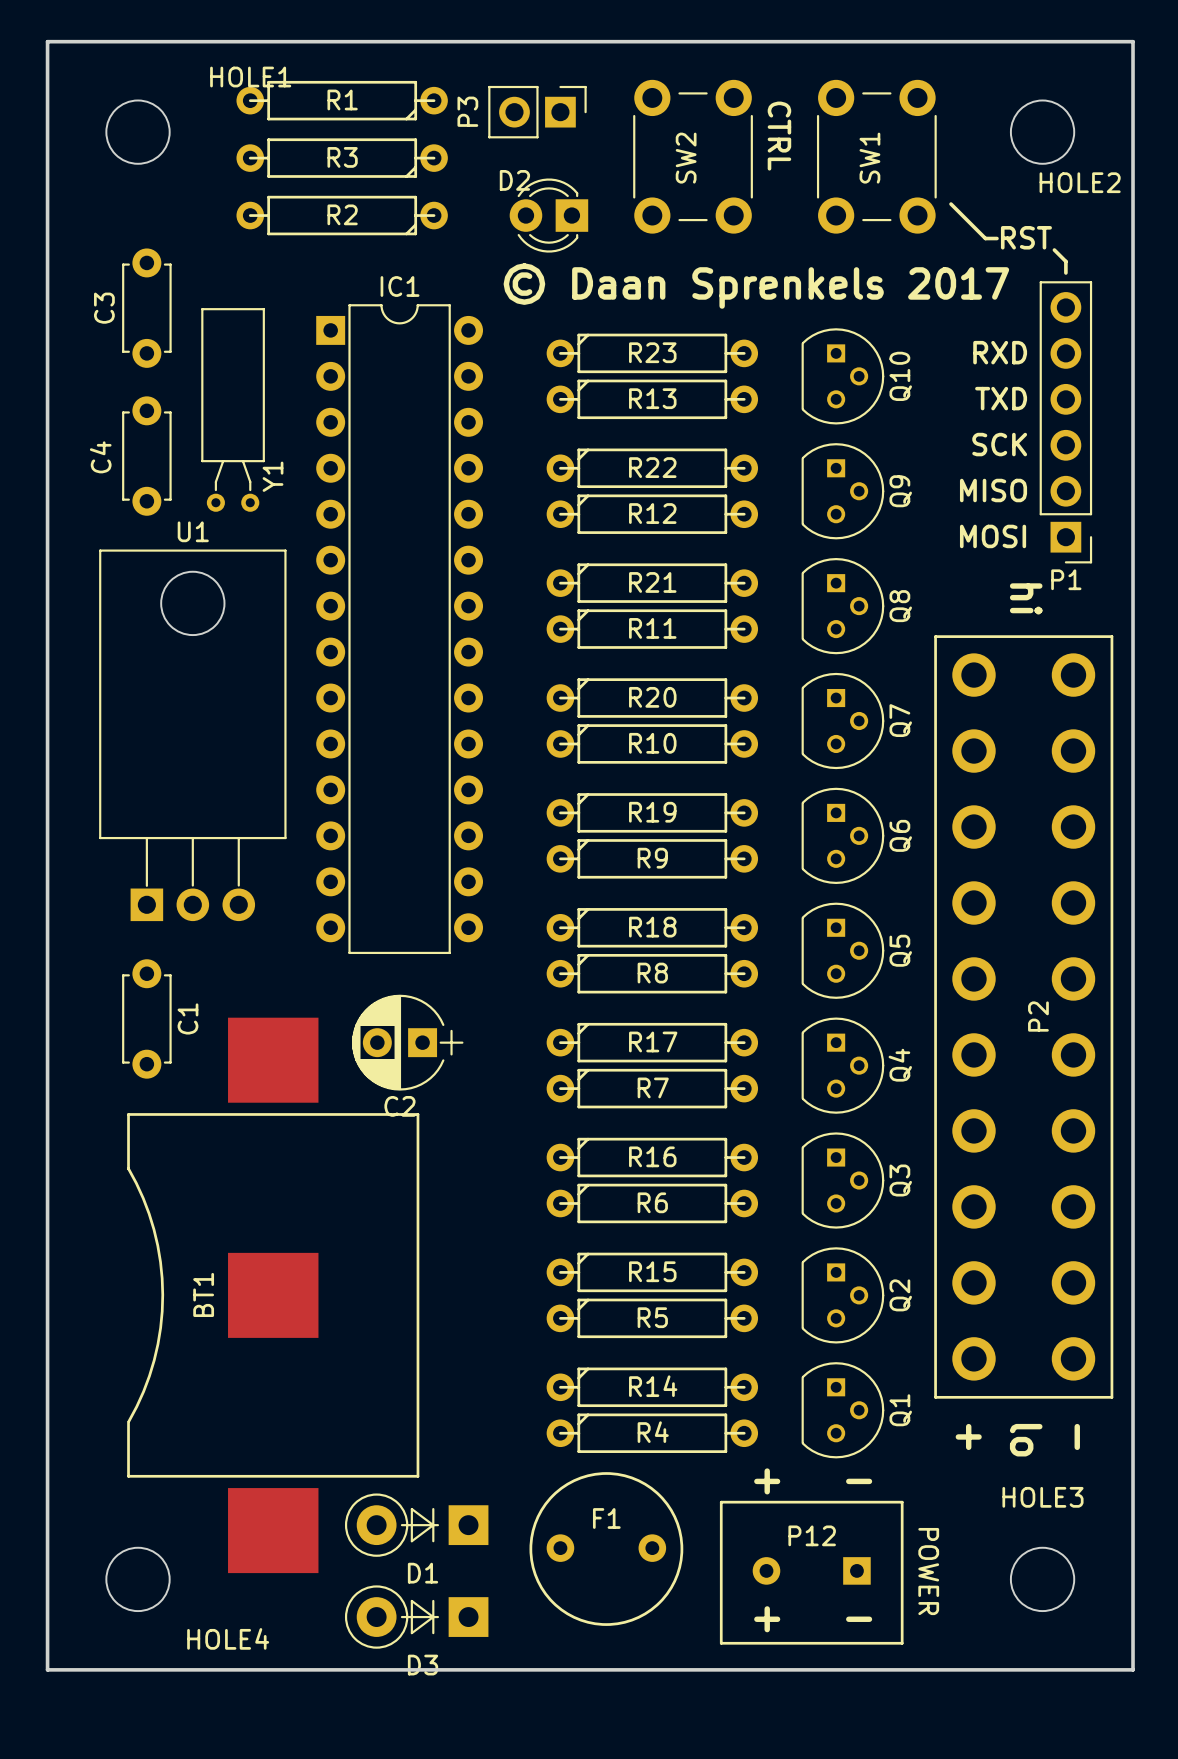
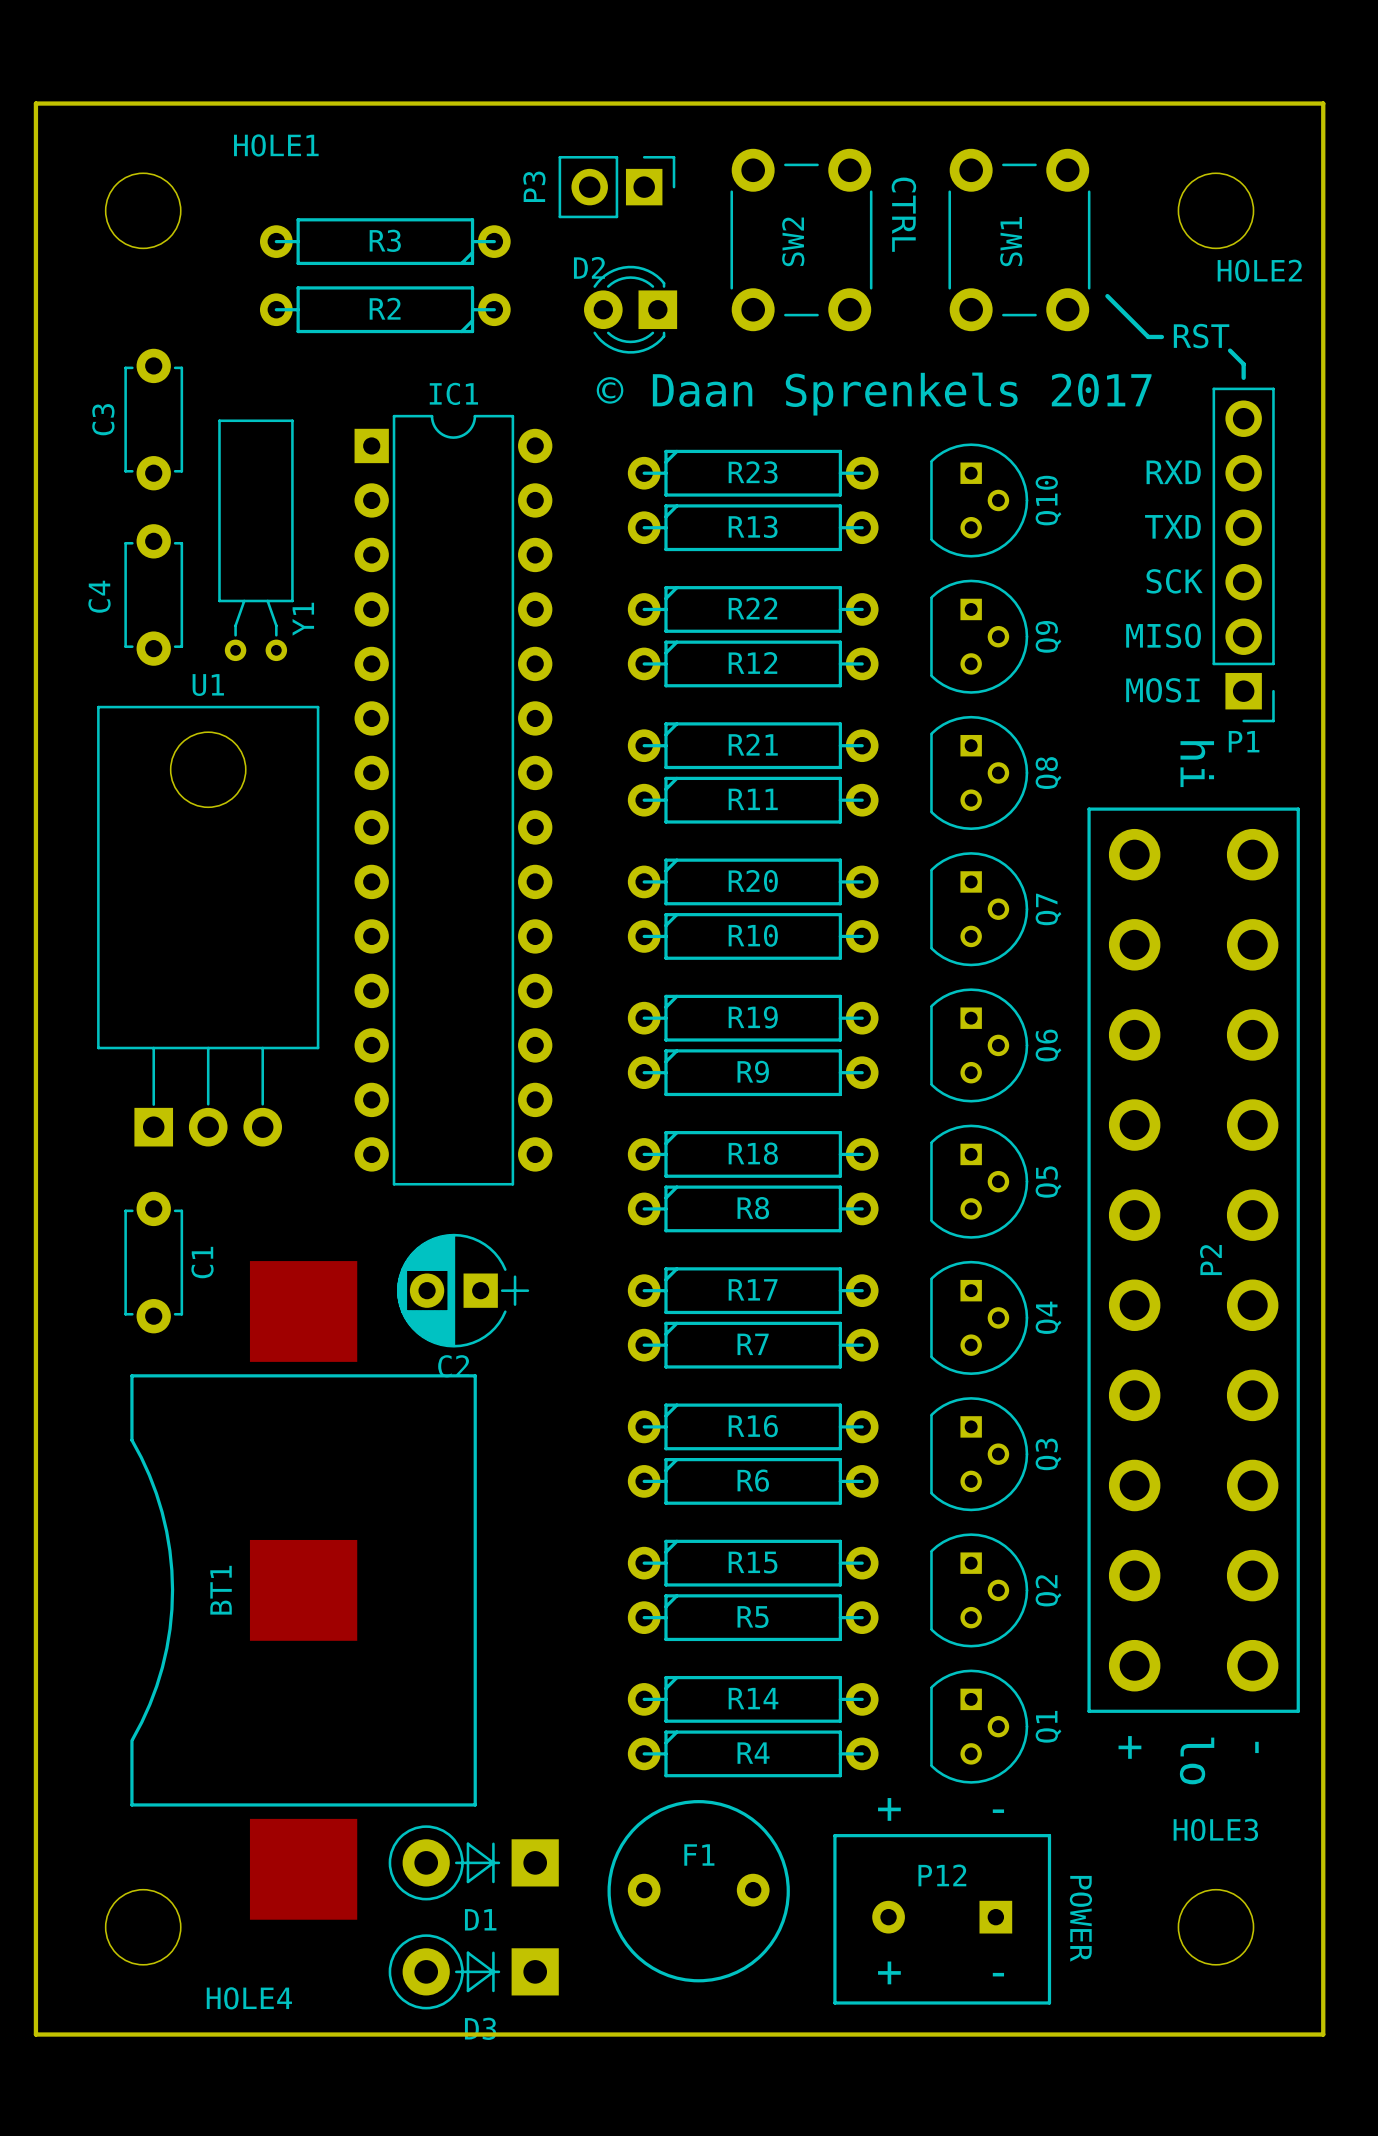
R1: (342, 100) -> none

